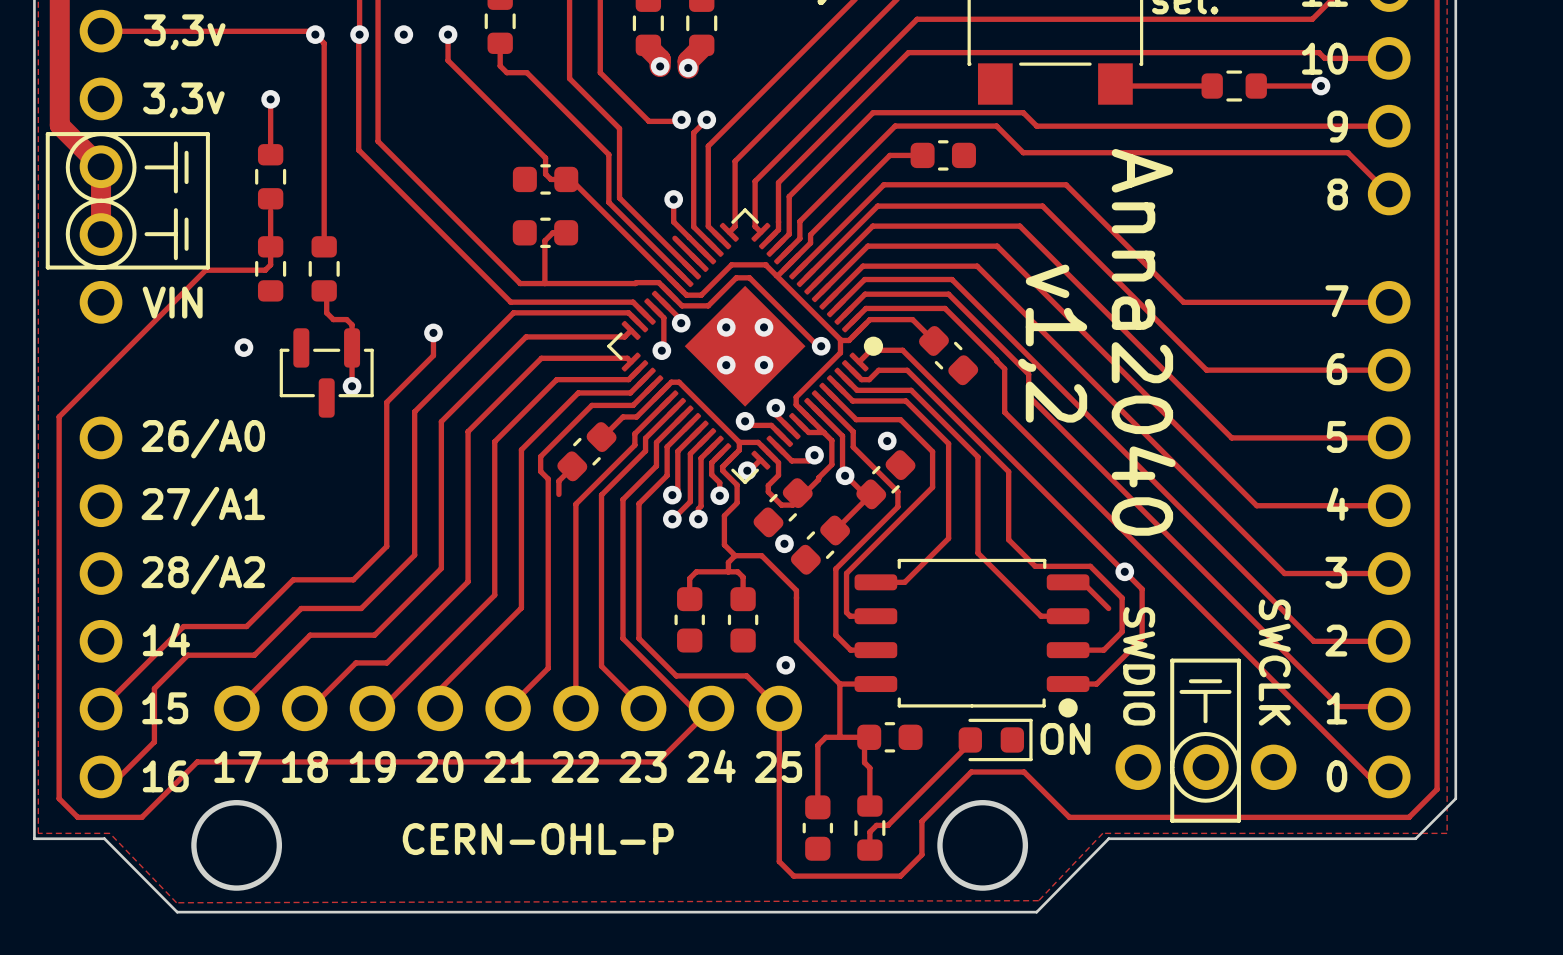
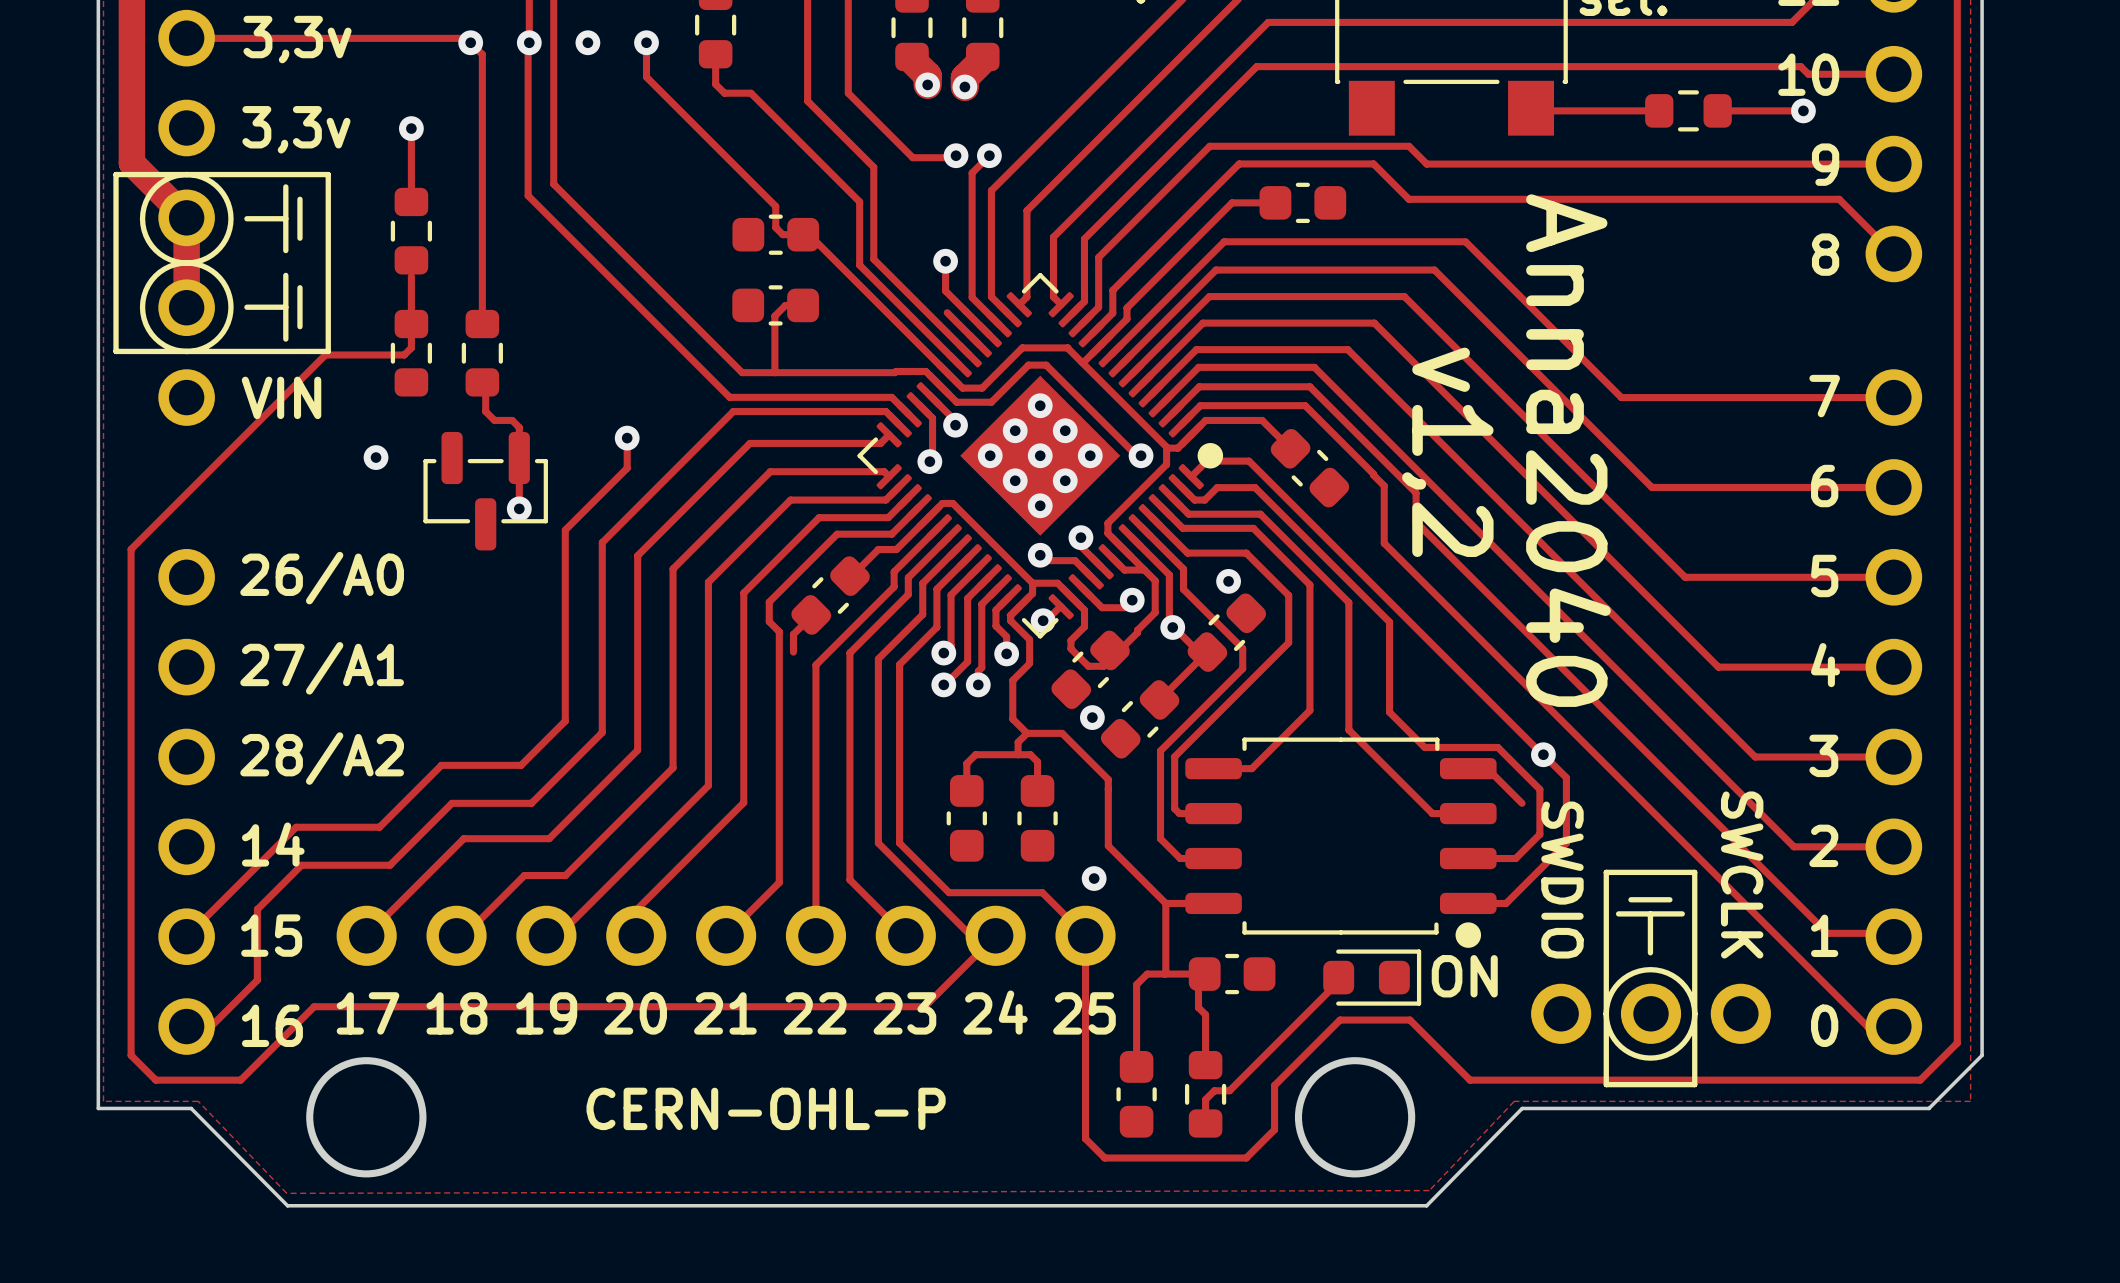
via: none -> (1040, 405)
via: none -> (990, 455)
via: none -> (1040, 455)
via: none -> (1090, 455)
via: none -> (1040, 505)

